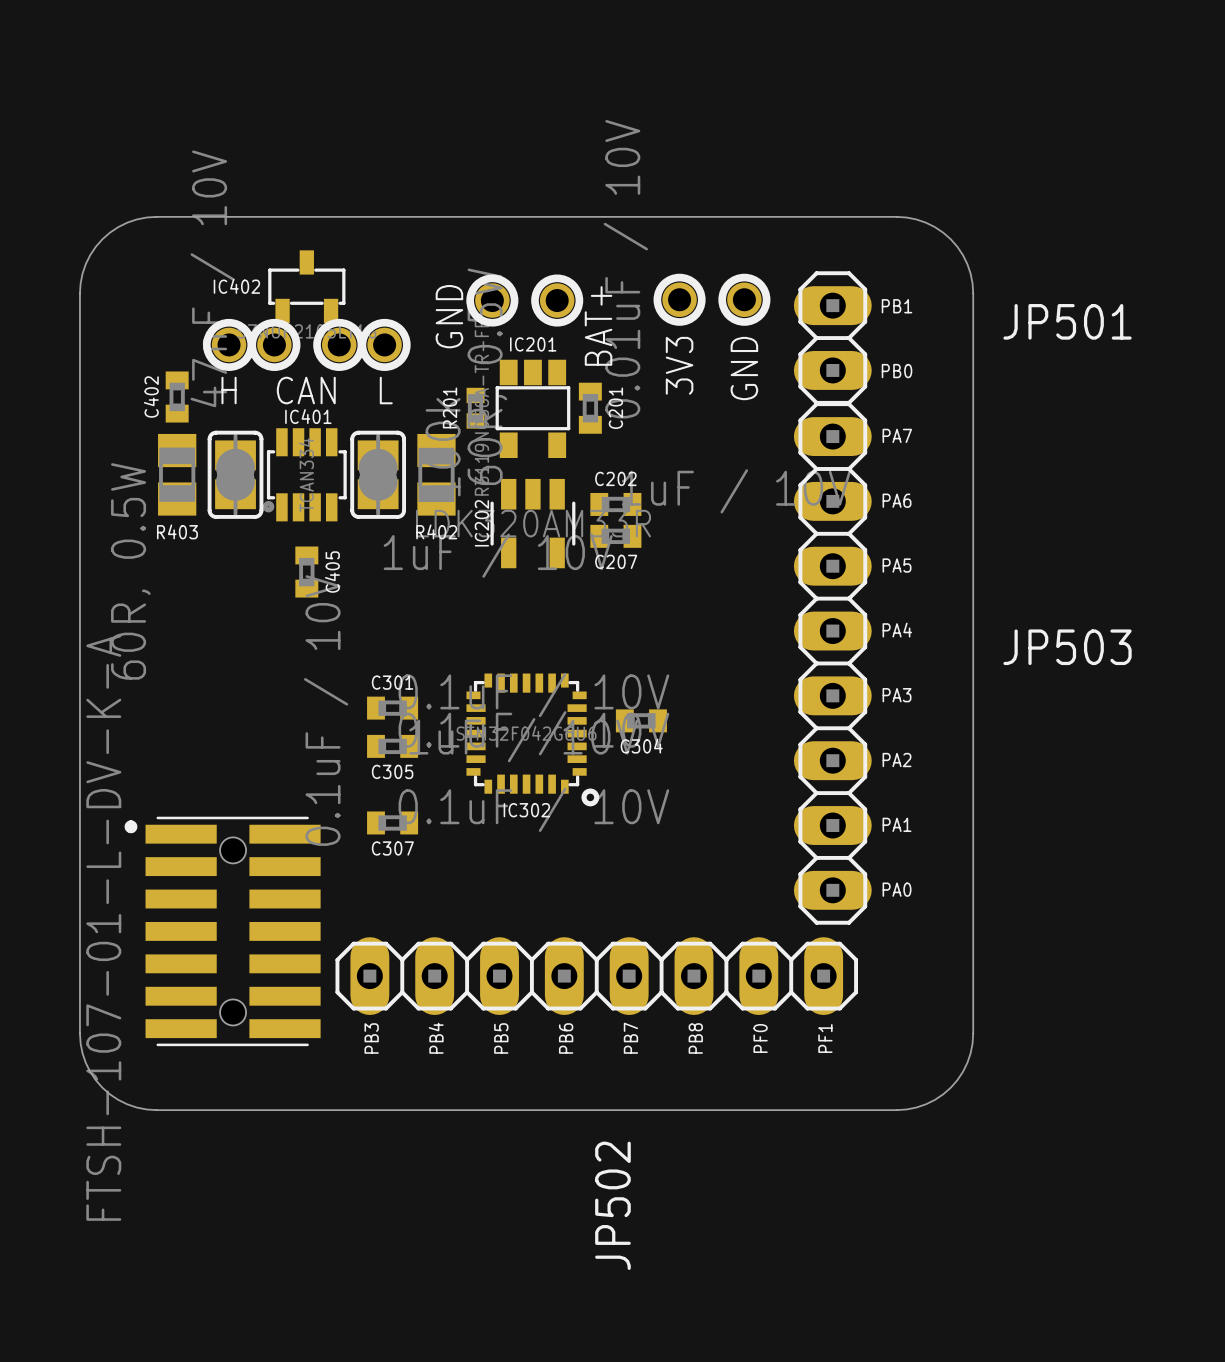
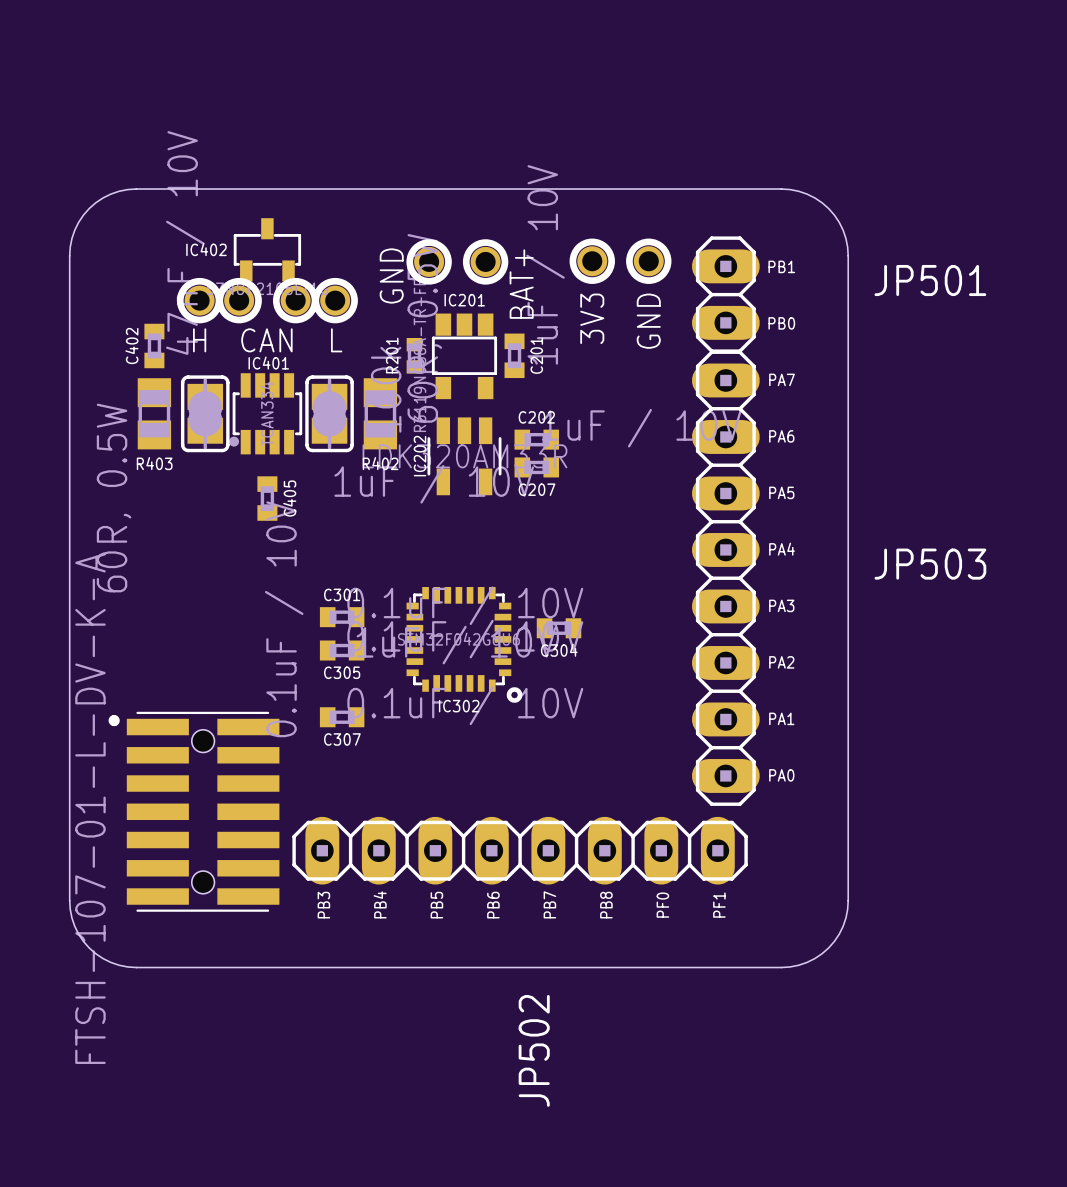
C201 value: 0.01uF / 10V (625, 269) -> 1uF / 10V (545, 264)

